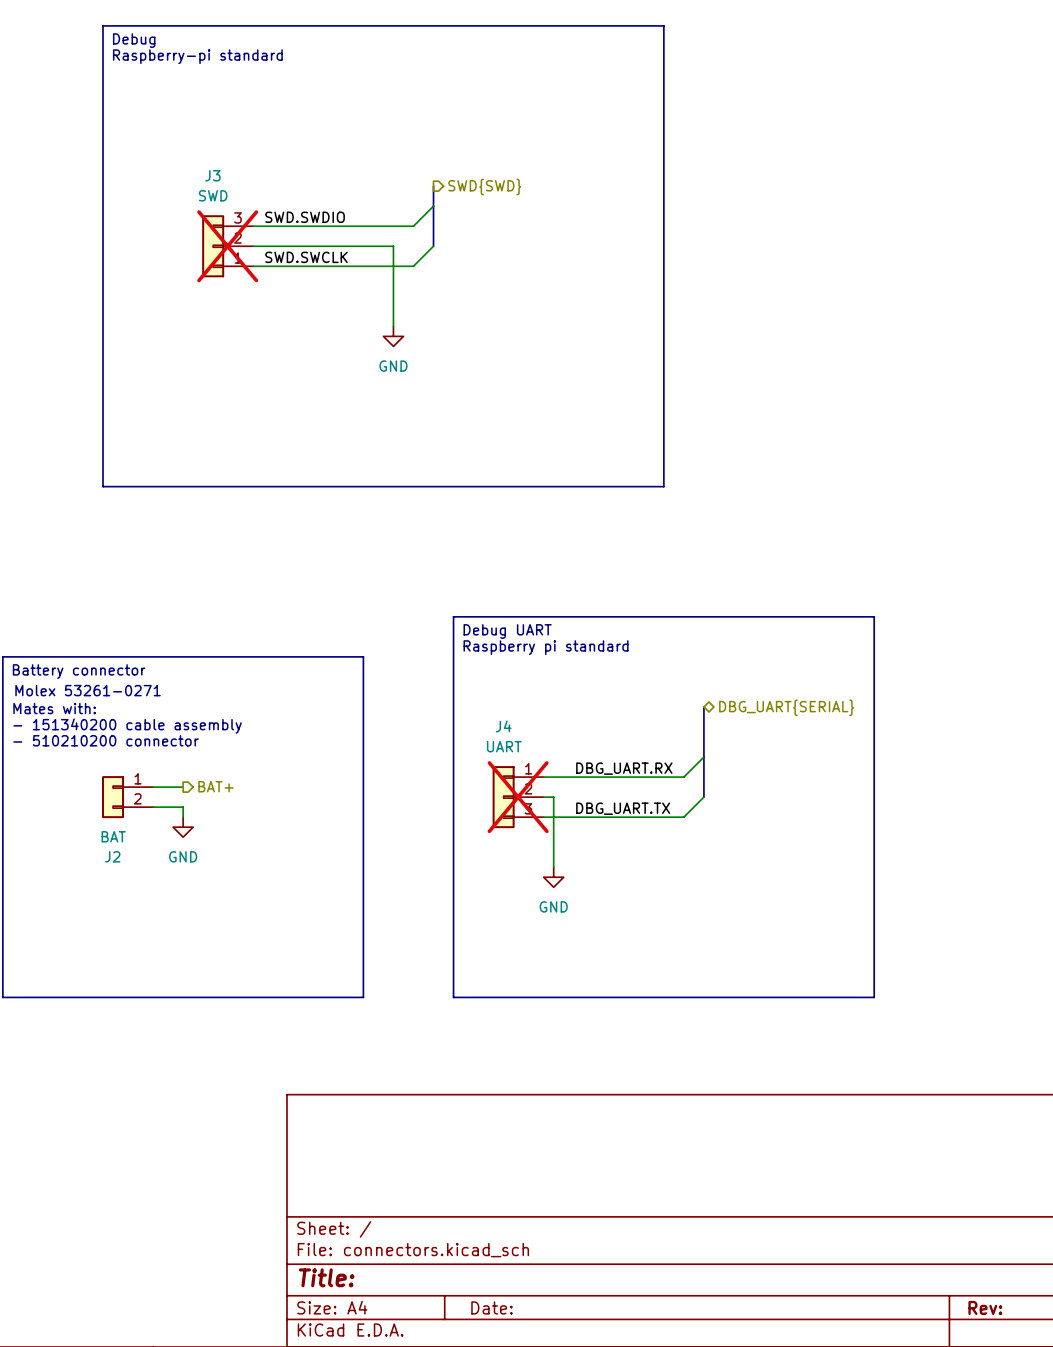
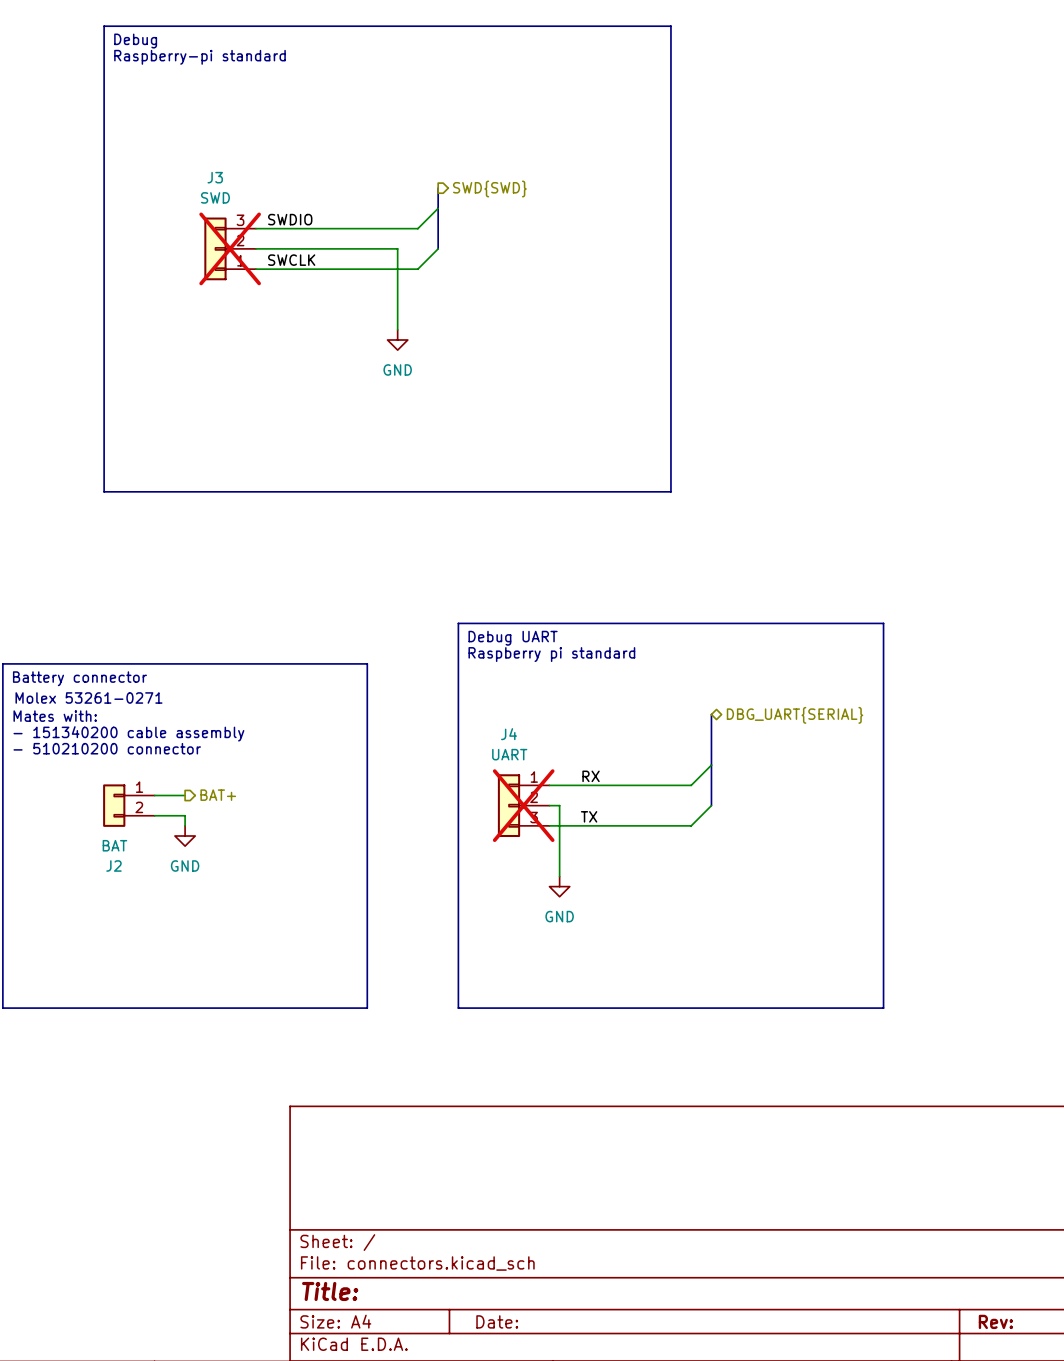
label: SWD.SWDIO (305, 217) -> SWDIO (290, 219)
label: SWD.SWCLK (306, 257) -> SWCLK (291, 260)
label: DBG_UART.RX (624, 768) -> RX (591, 776)
label: DBG_UART.TX (623, 808) -> TX (589, 816)

